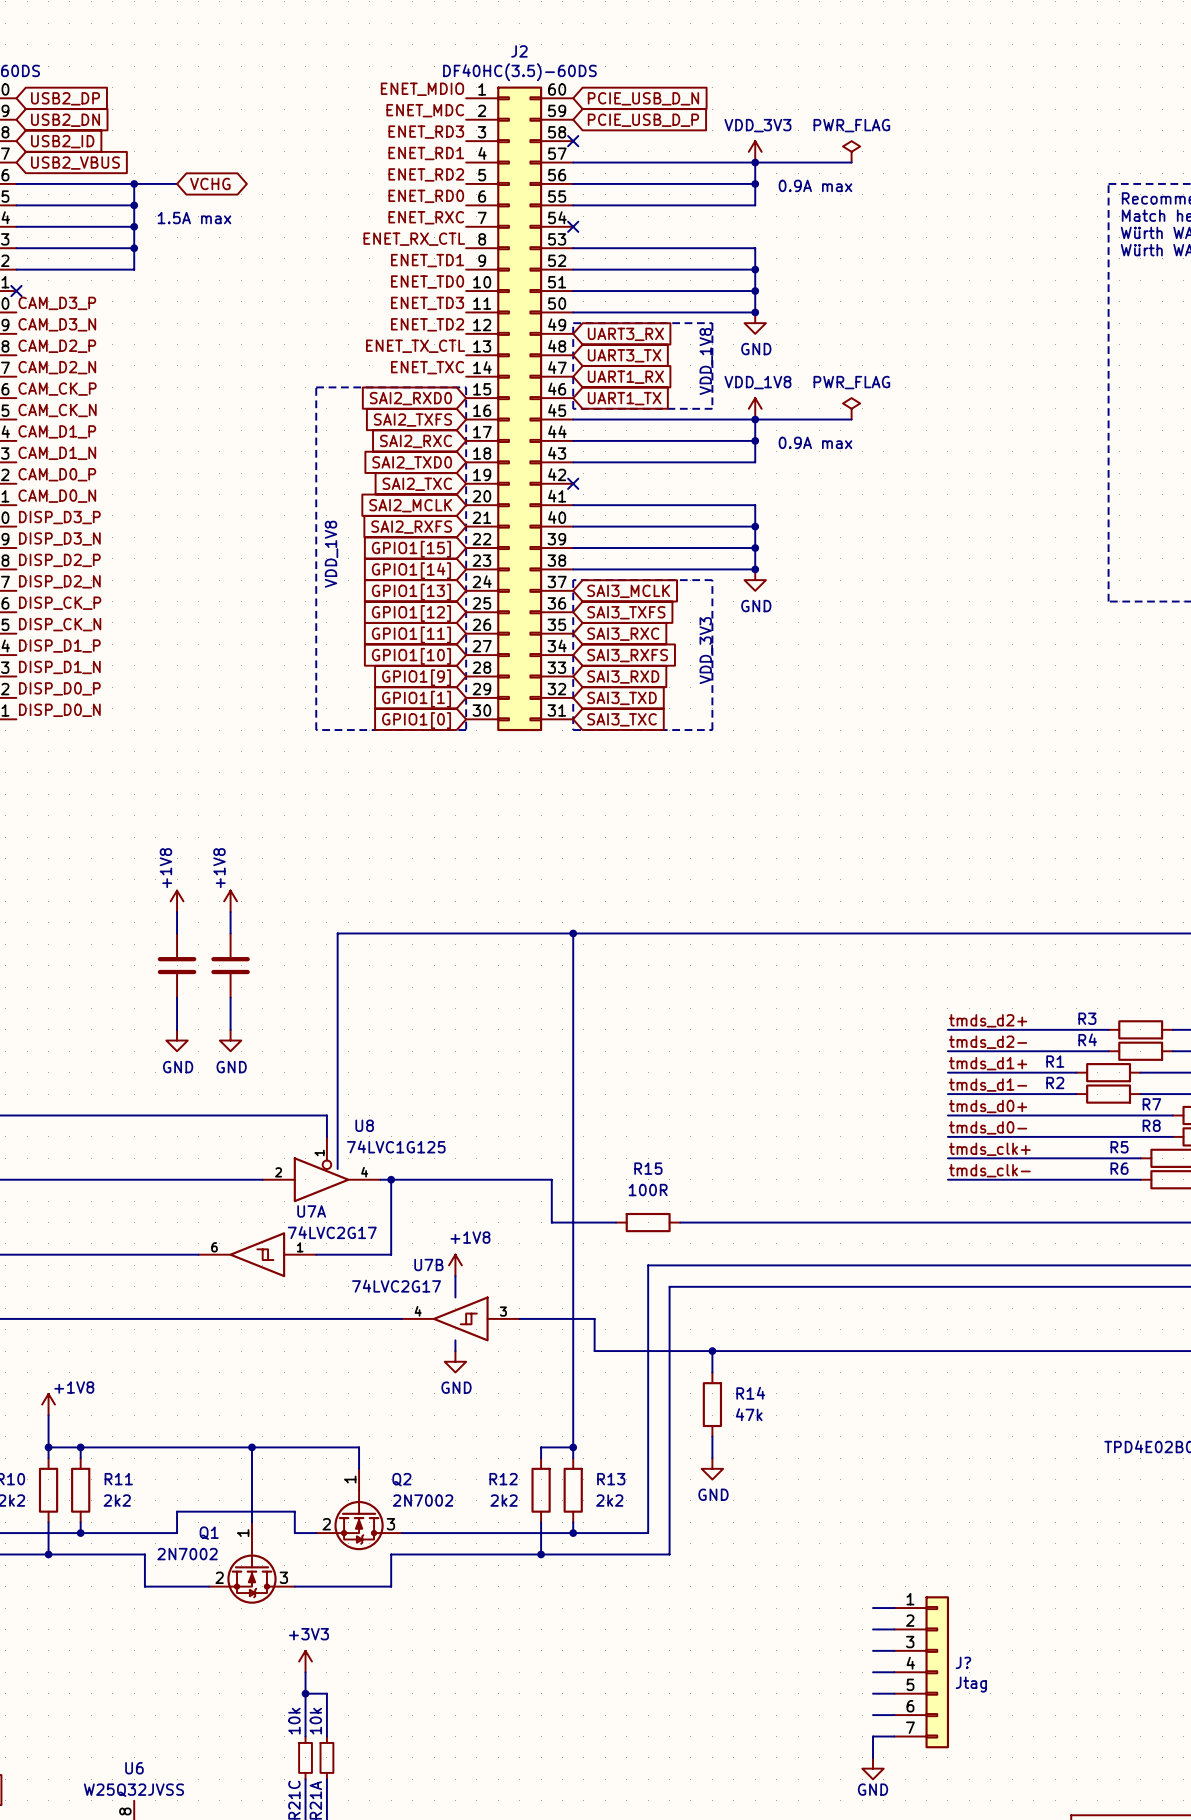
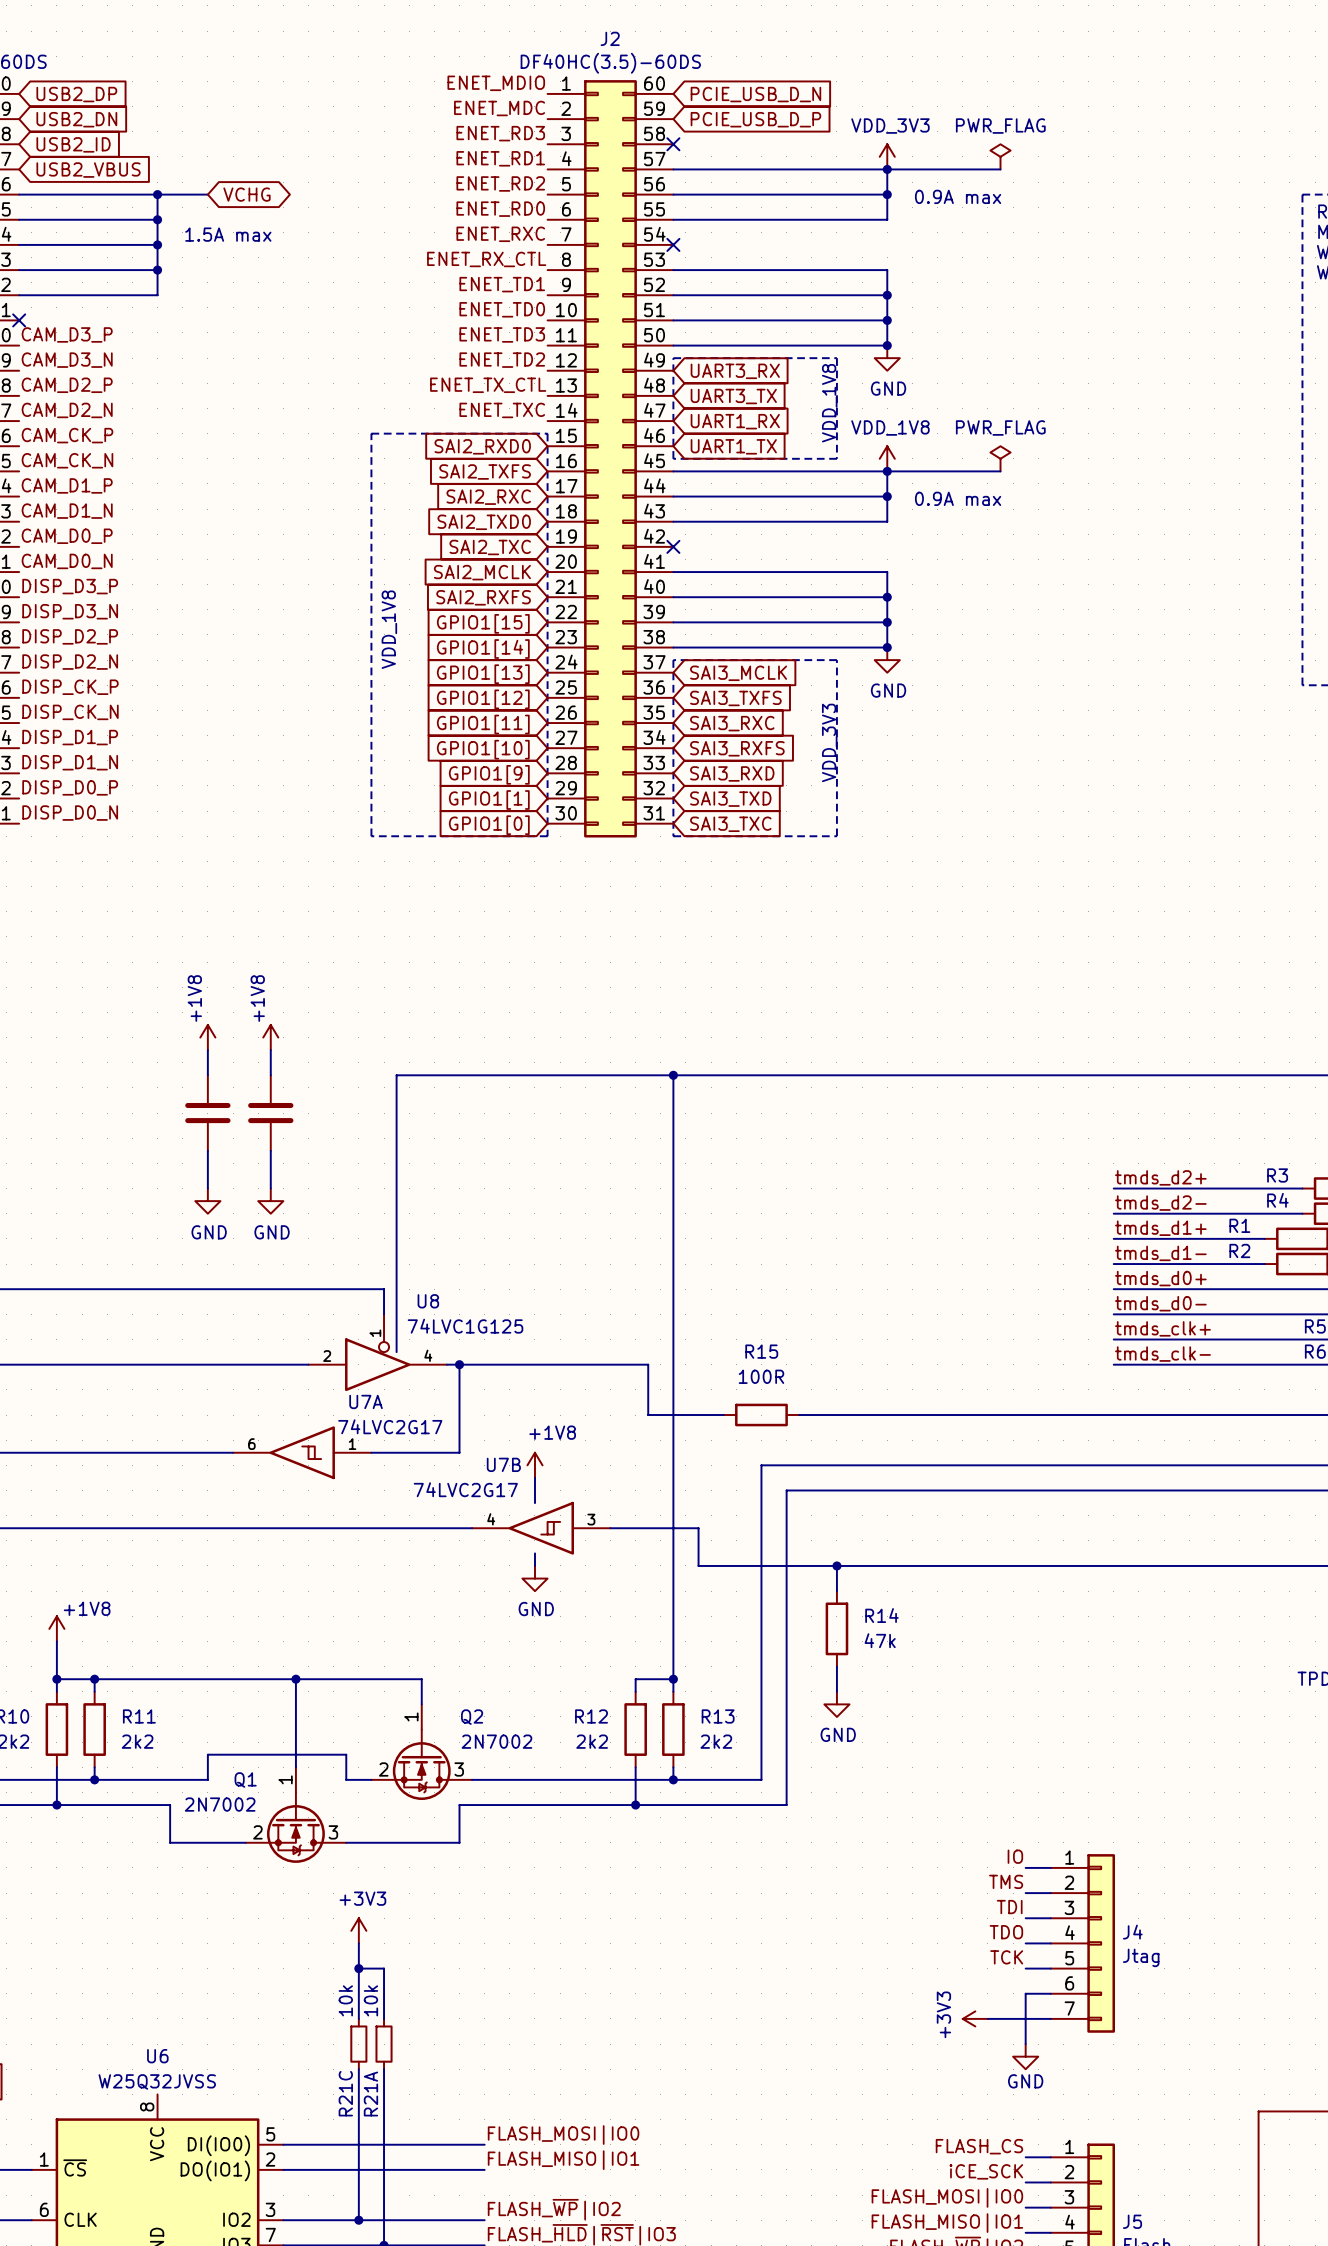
label: none -> IO (1015, 1856)
label: none -> TMS (1006, 1881)
label: none -> TDI (1009, 1907)
label: none -> TDO (1006, 1932)
J? name: J? (963, 1662) -> J4 (1132, 1932)
label: none -> TCK (1006, 1957)
wire: none -> (1025, 1993) (1025, 2018) (987, 2018)
power symbol: none -> +3V3 (975, 2018)

